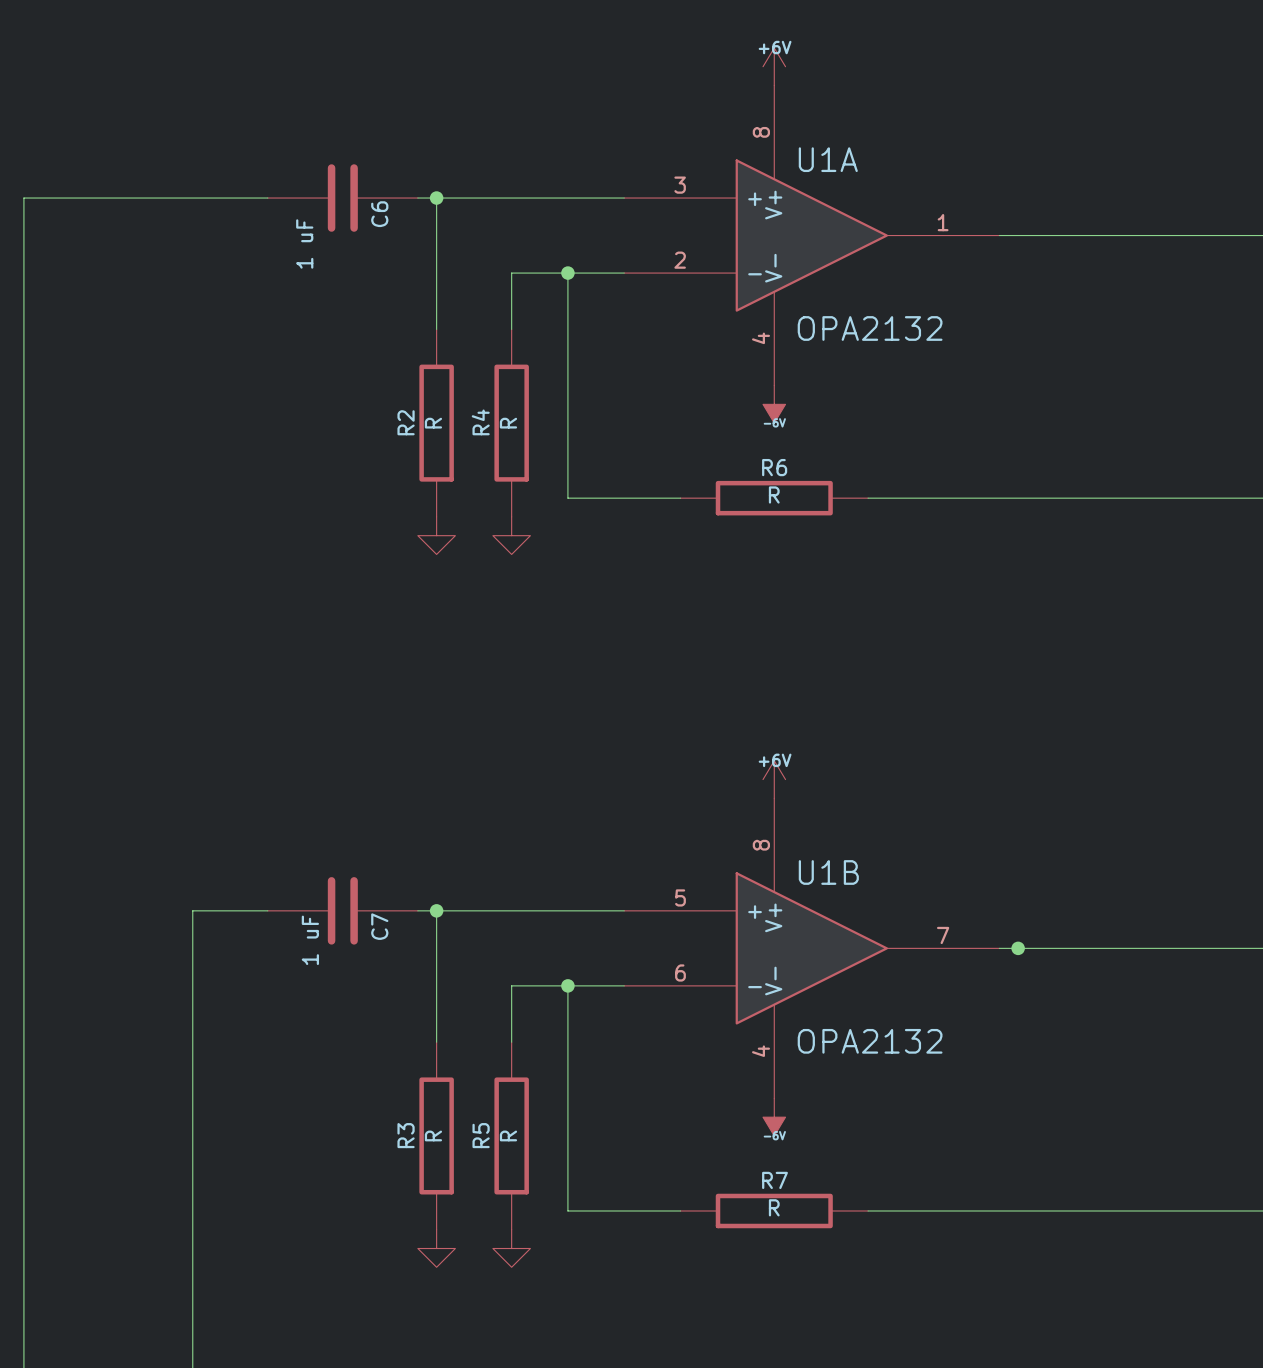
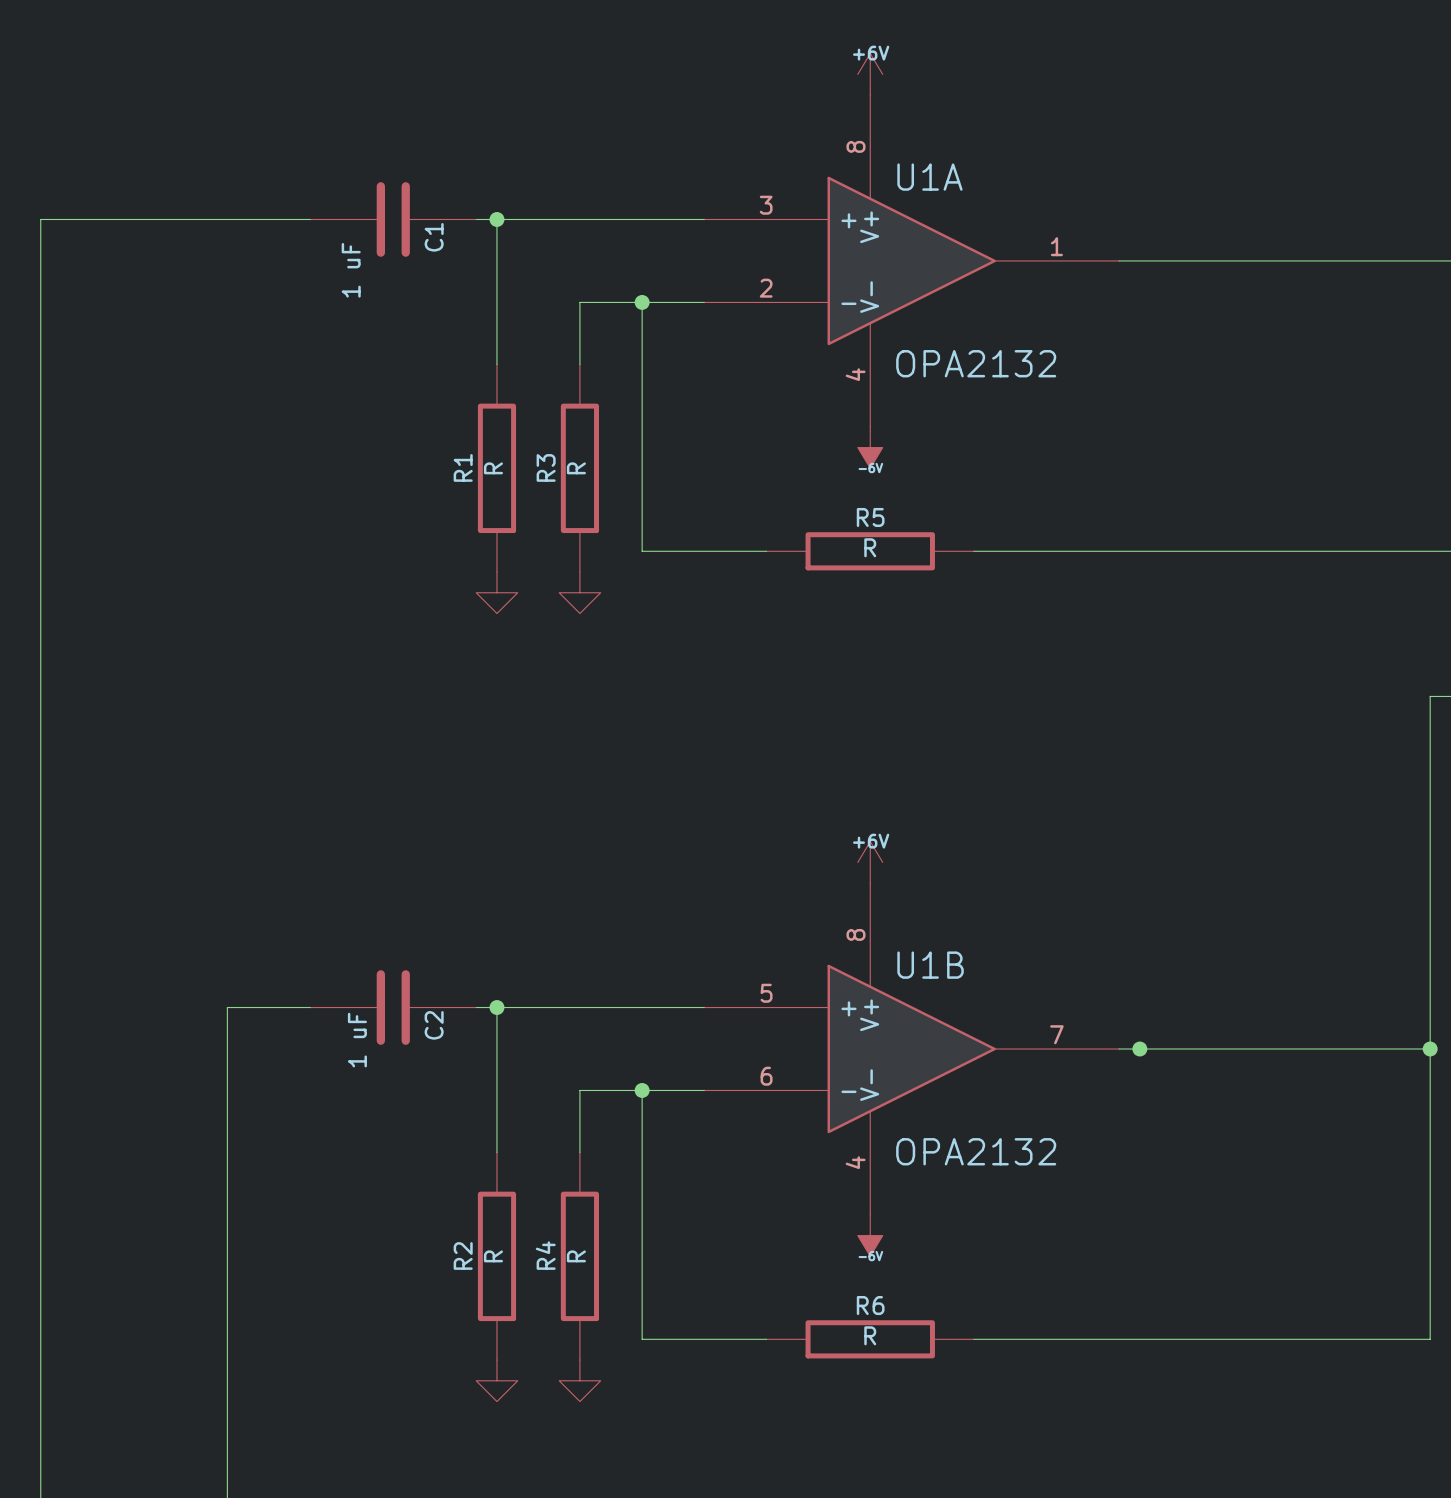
C6 name: C6 (379, 214) -> C1 (434, 237)
R2 name: R2 (406, 422) -> R1 (463, 467)
R4 name: R4 (480, 422) -> R3 (546, 467)
R6 name: R6 (774, 467) -> R5 (870, 517)
C7 name: C7 (379, 926) -> C2 (434, 1025)
R3 name: R3 (406, 1135) -> R2 (463, 1255)
R5 name: R5 (481, 1135) -> R4 (545, 1255)
R7 name: R7 (774, 1180) -> R6 (870, 1305)

